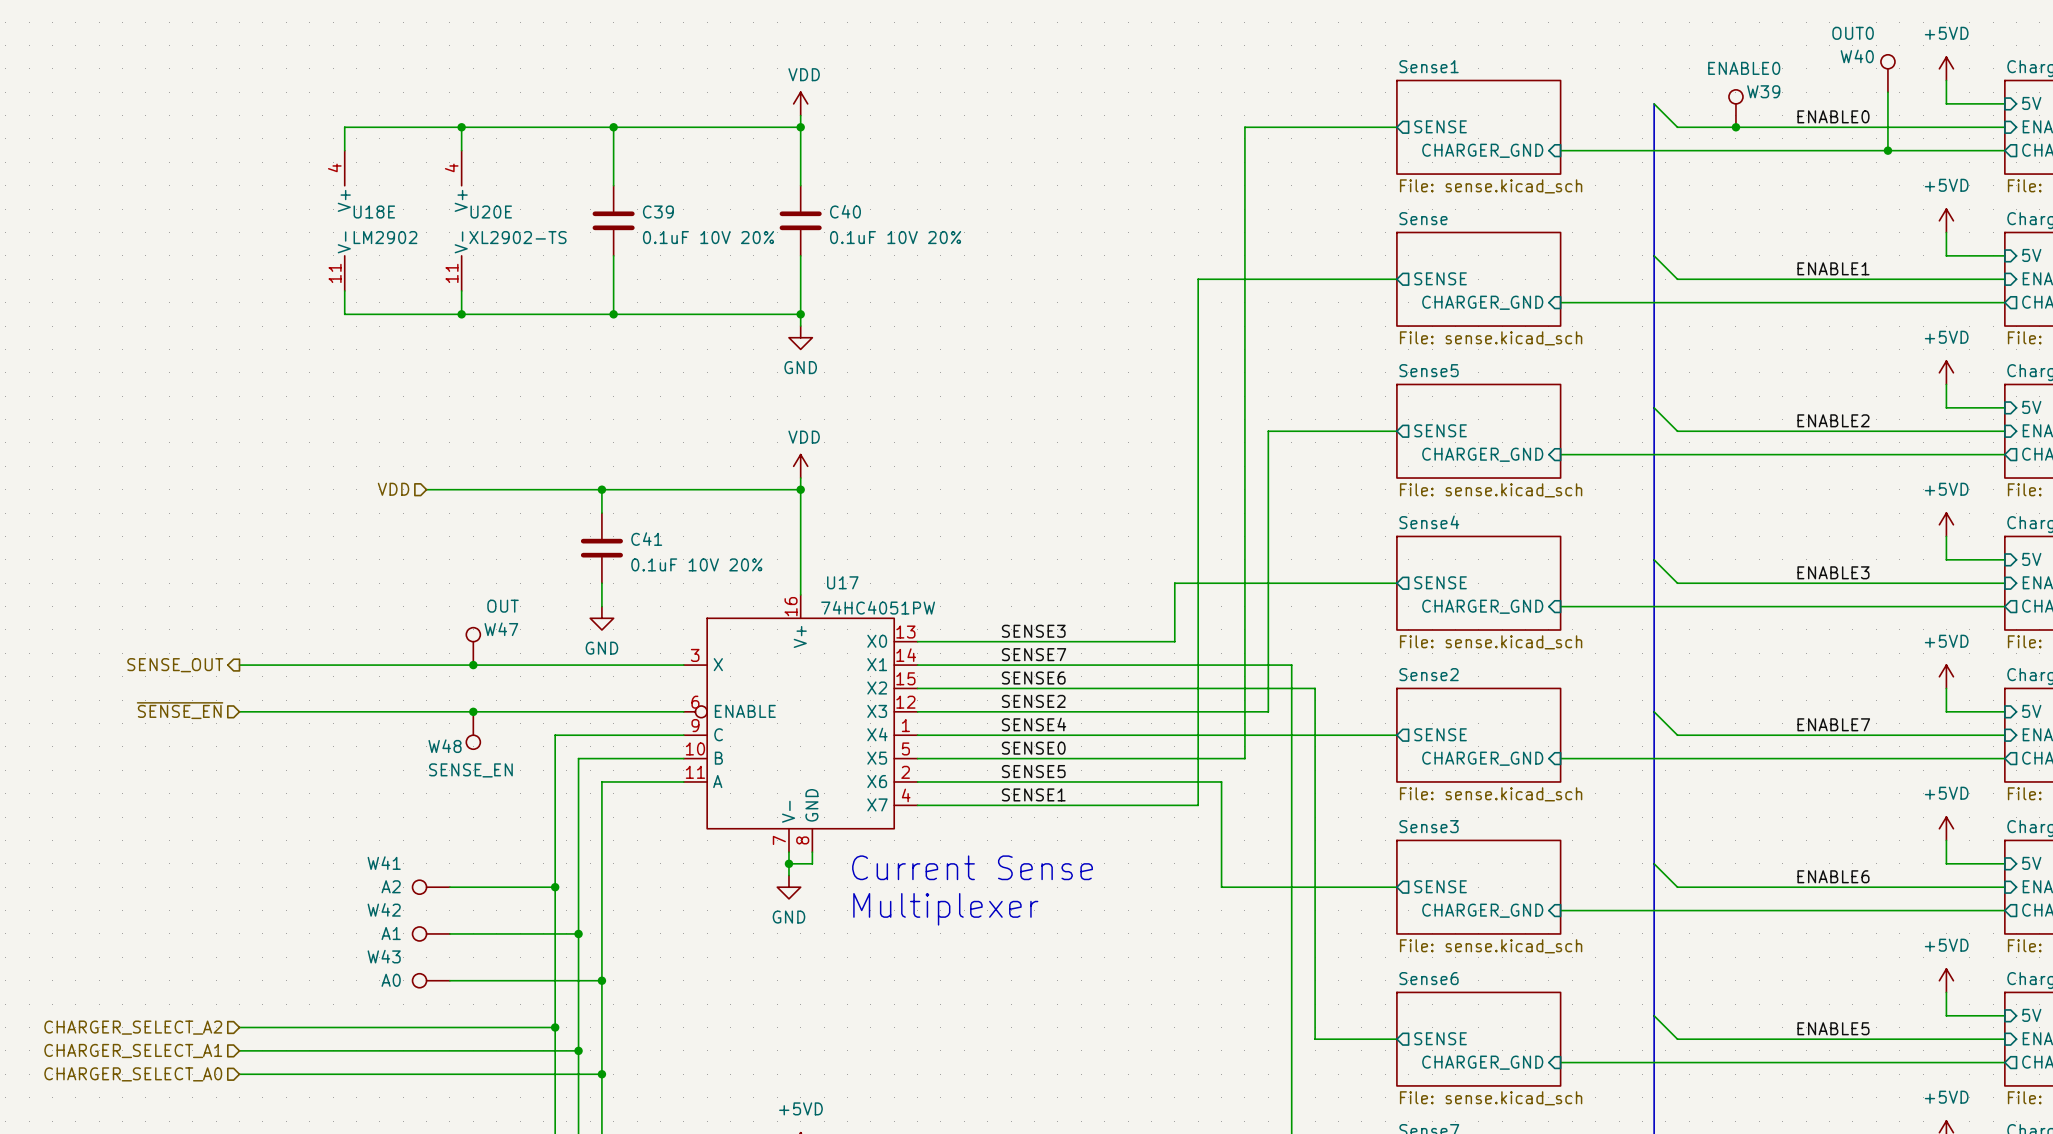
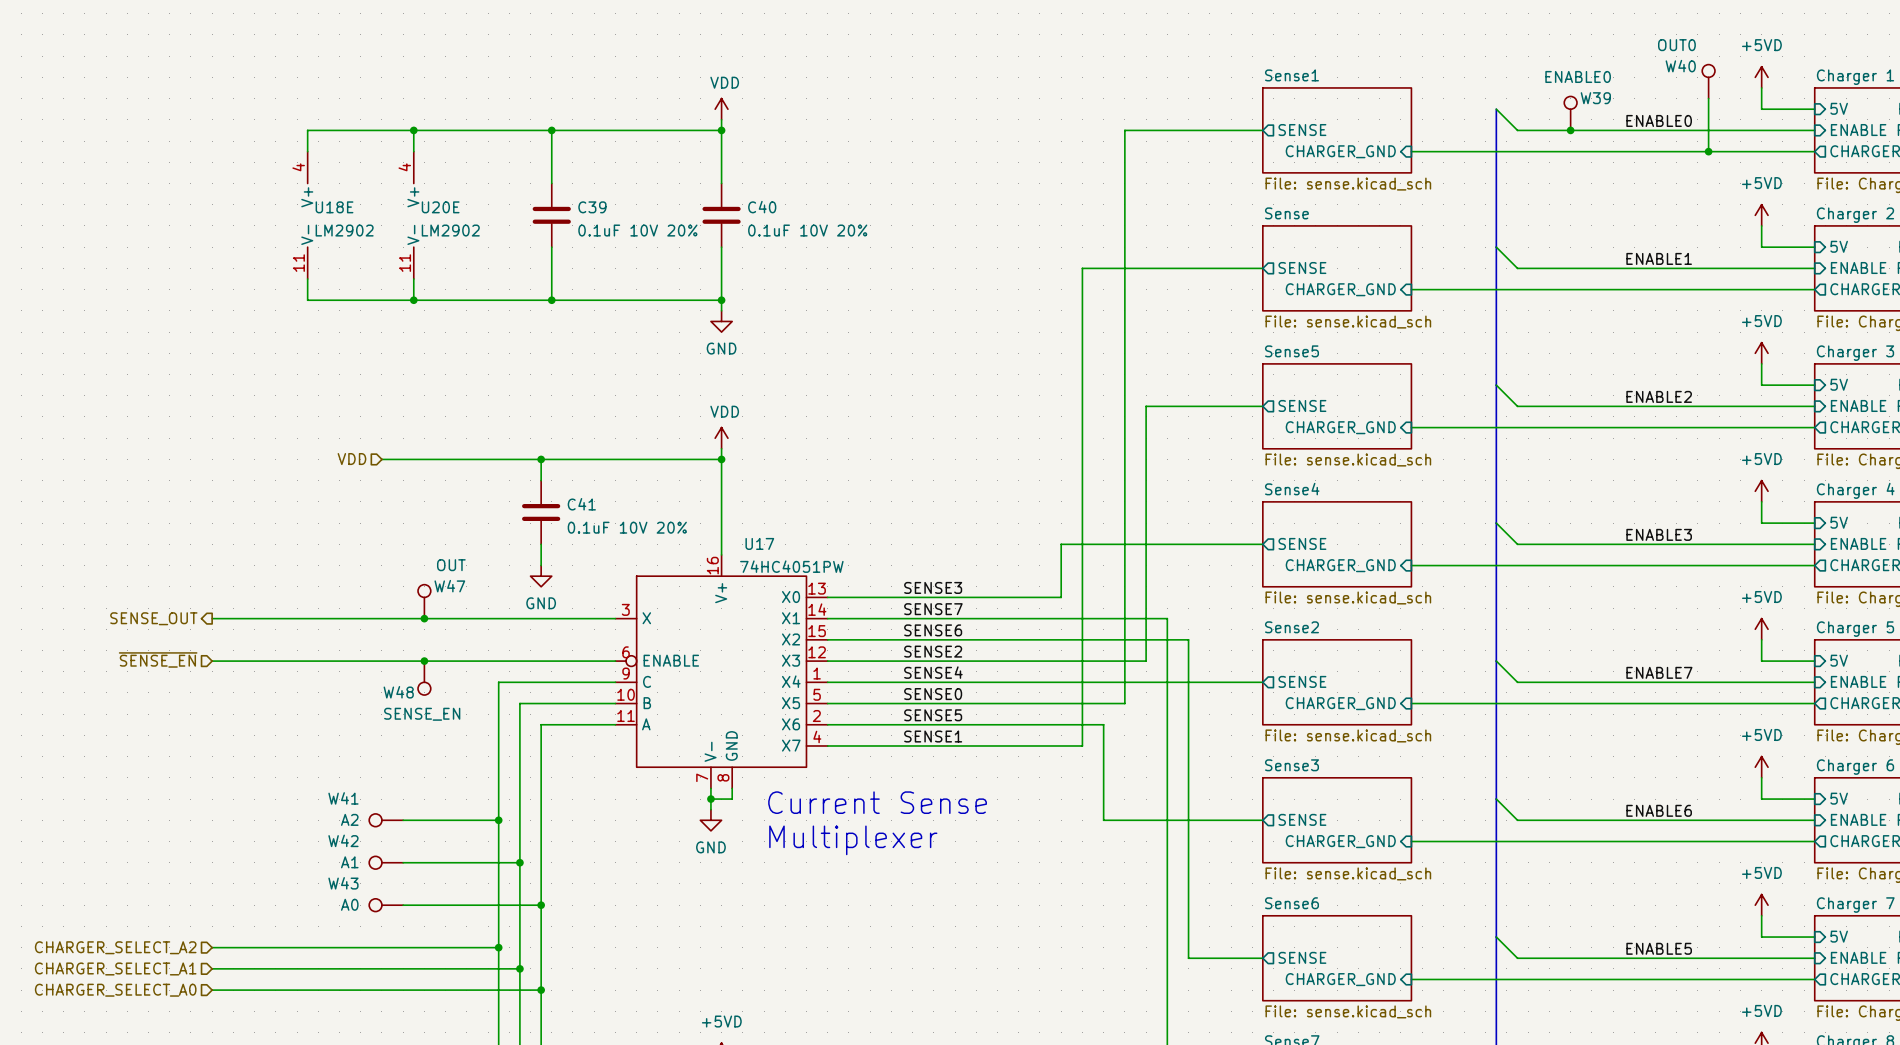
U20E value: XL2902-TS (517, 237) -> LM2902 (450, 230)

